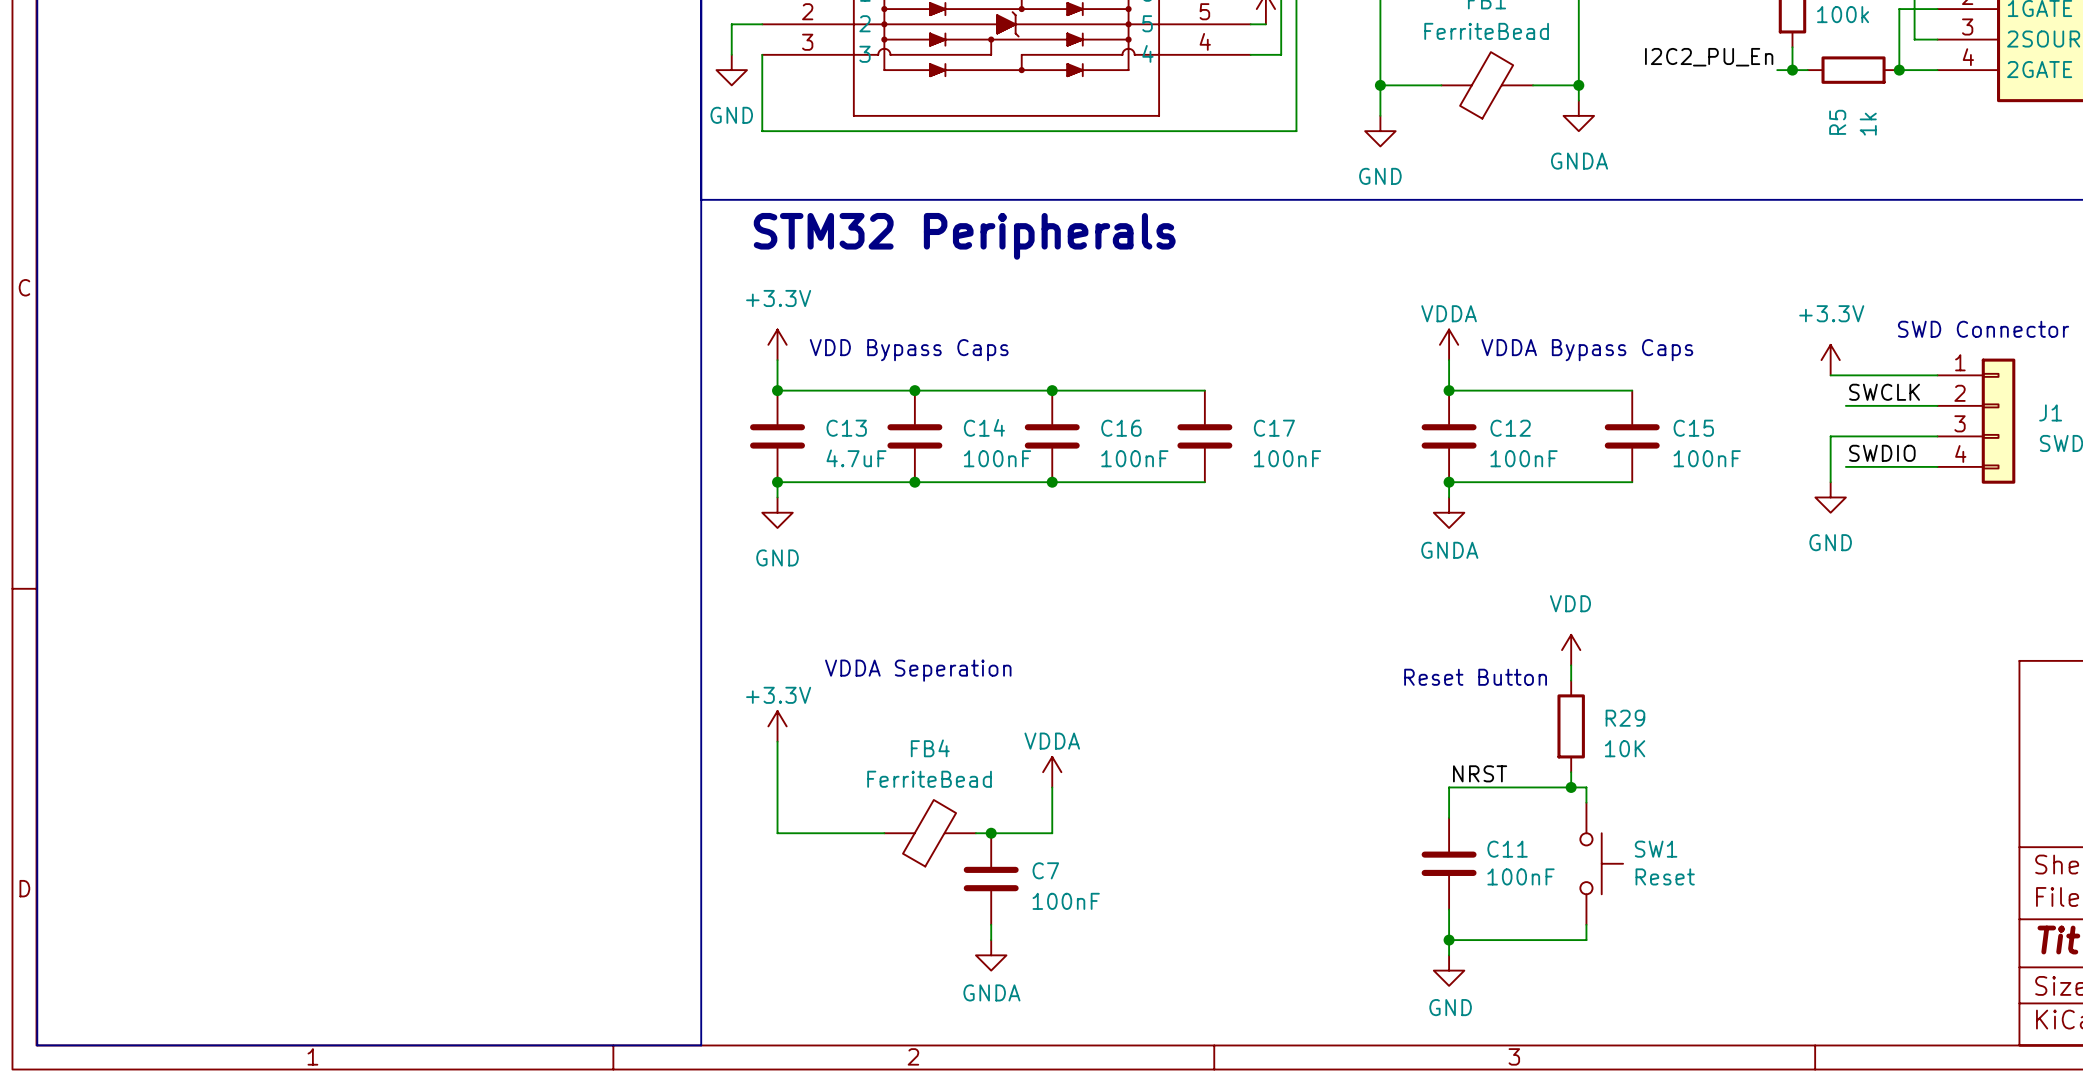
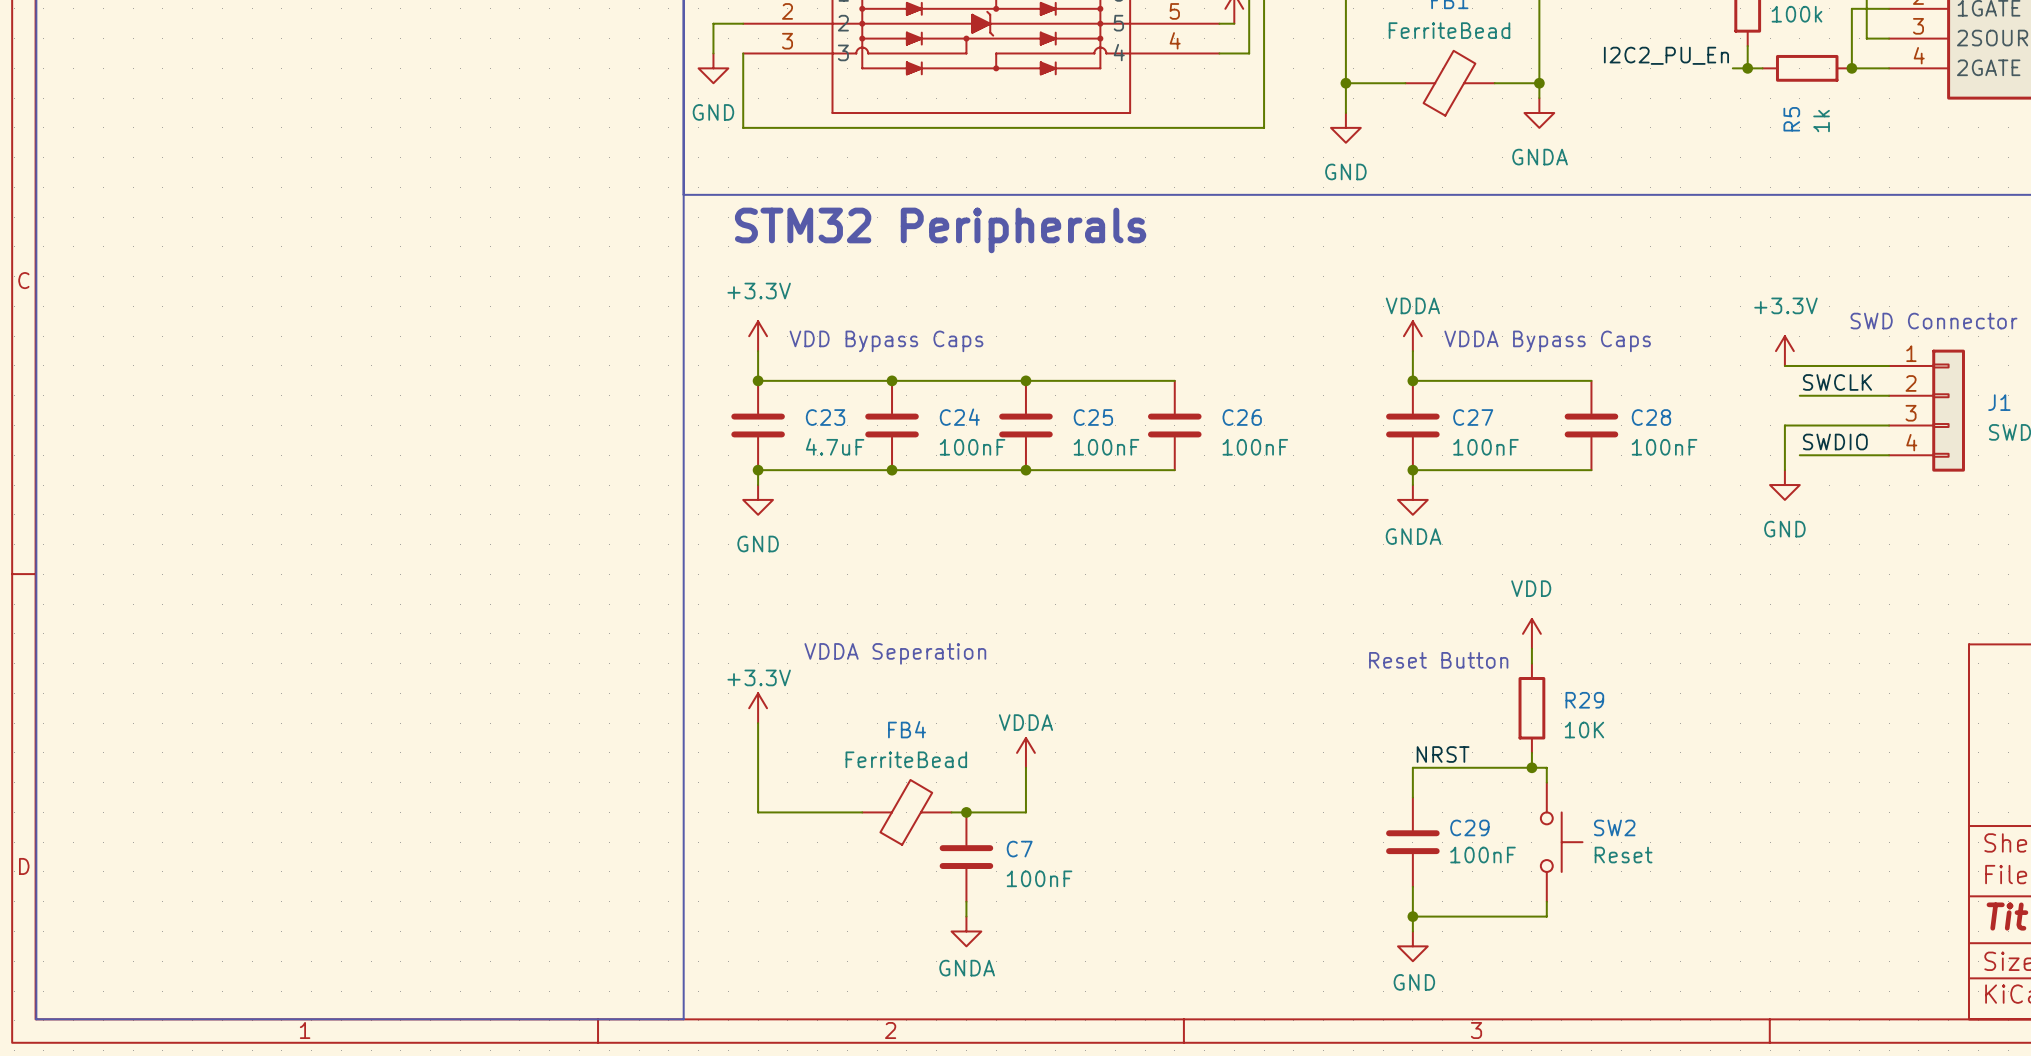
C14 name: C14 (984, 427) -> C24 (959, 417)
C13 name: C13 (846, 428) -> C23 (825, 417)
C16 name: C16 (1121, 428) -> C25 (1093, 417)
C17 name: C17 (1274, 428) -> C26 (1242, 417)
C12 name: C12 (1510, 428) -> C27 (1473, 417)
C15 name: C15 (1693, 428) -> C28 (1651, 417)
C11 name: C11 (1507, 849) -> C29 (1469, 827)
SW1 name: SW1 (1656, 849) -> SW2 (1614, 827)

